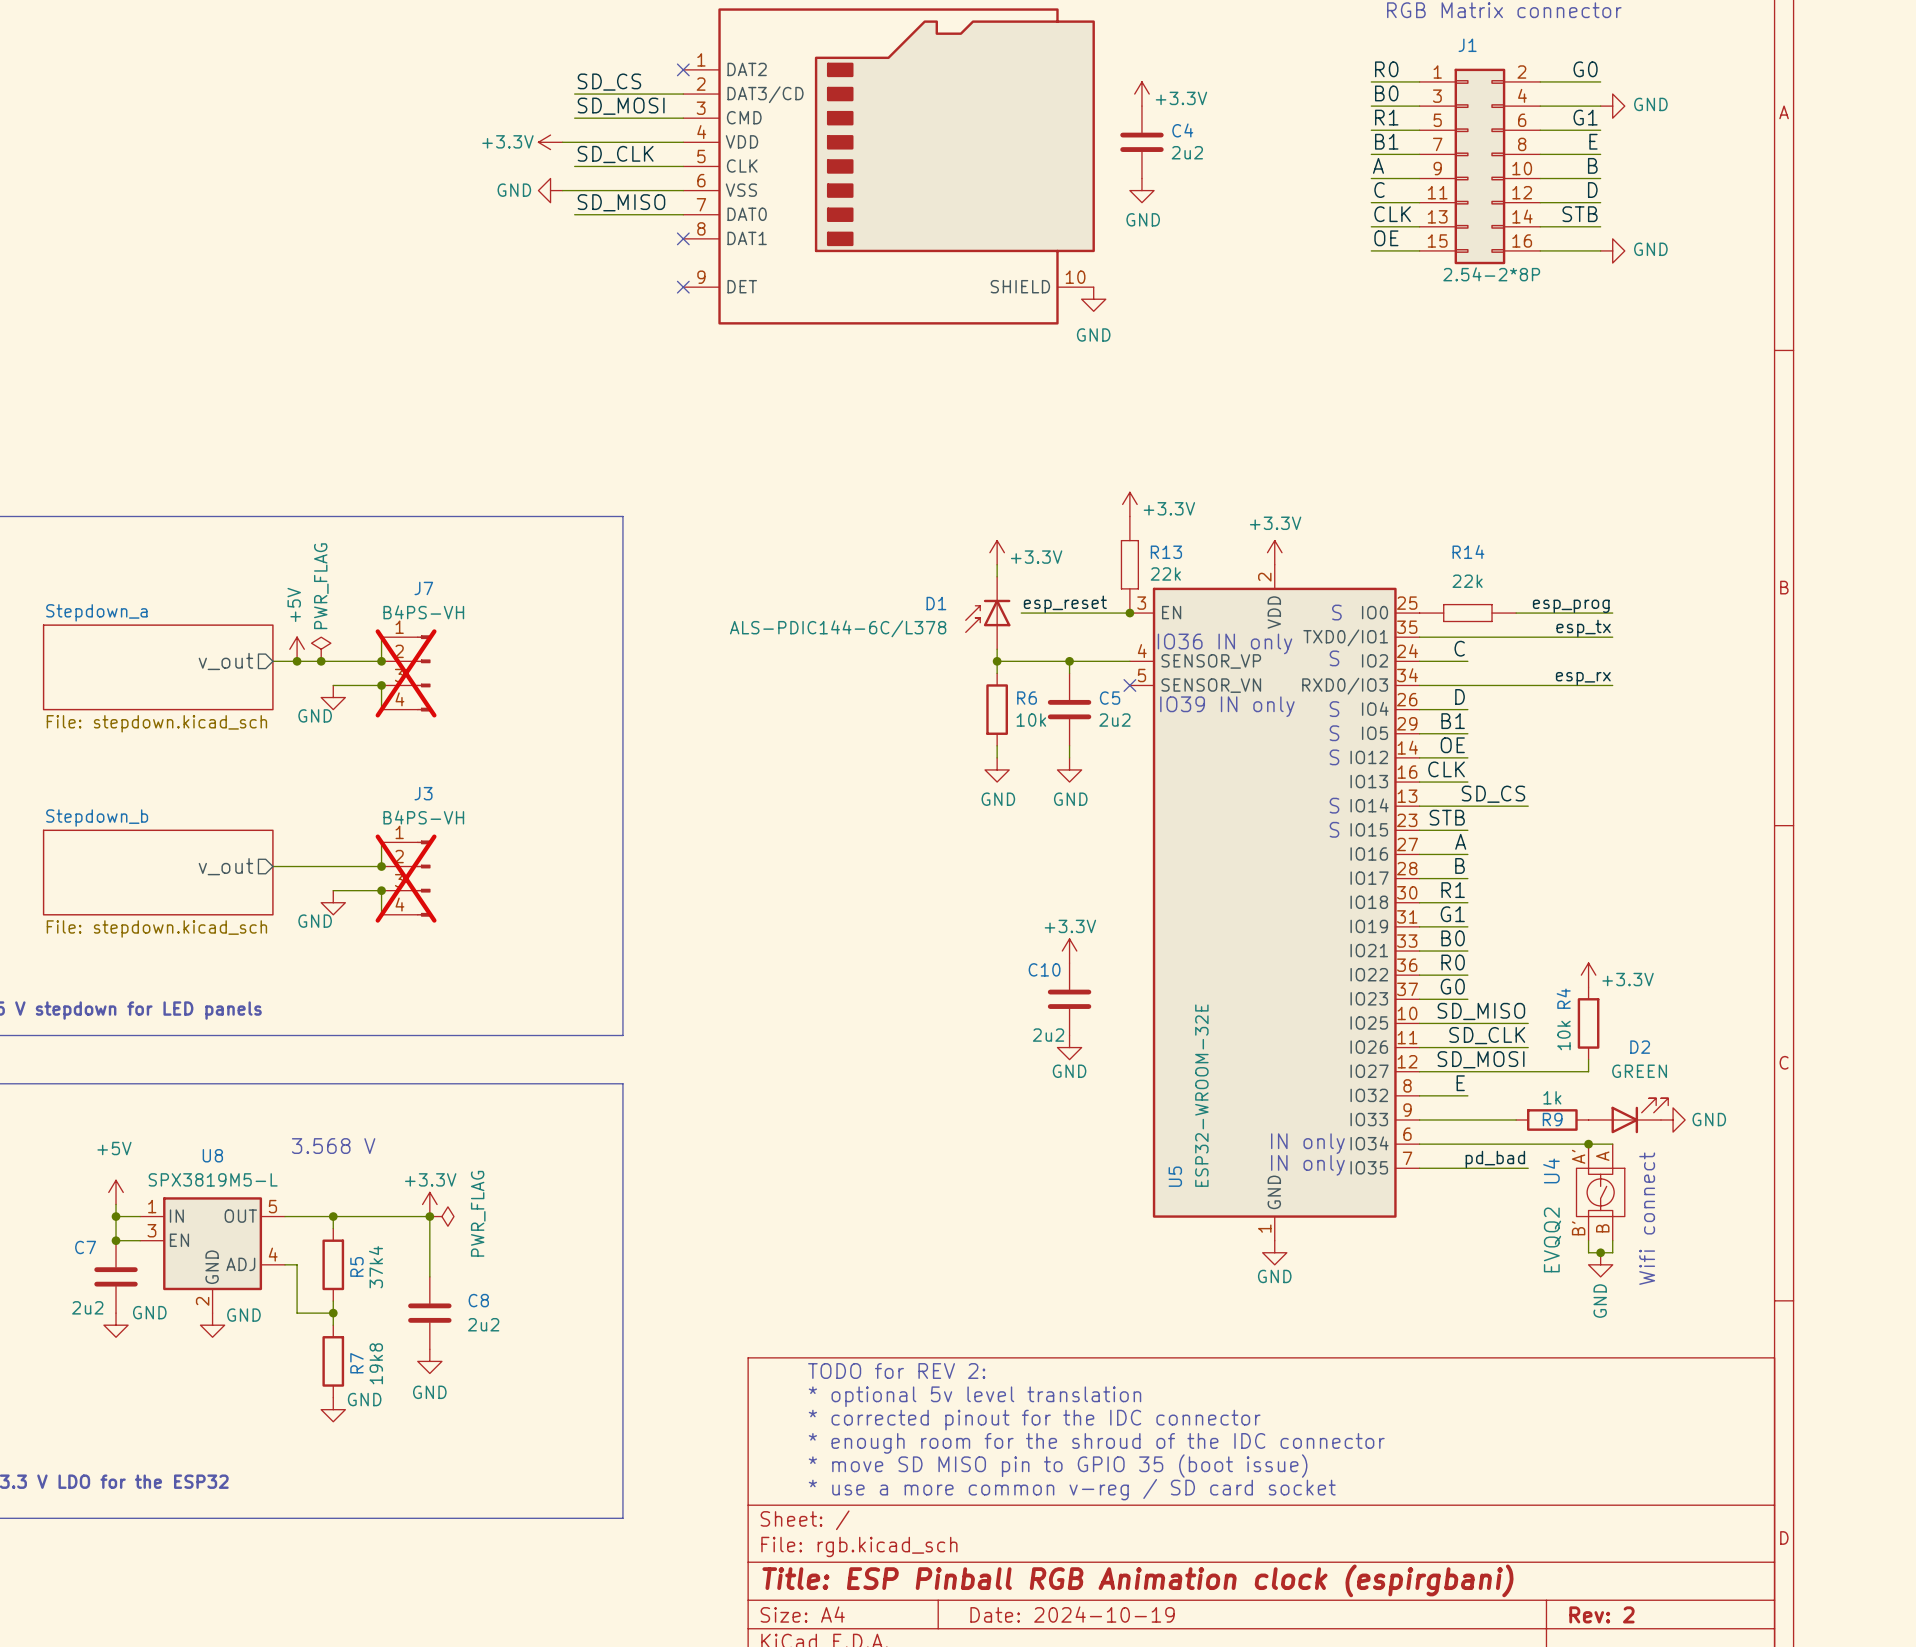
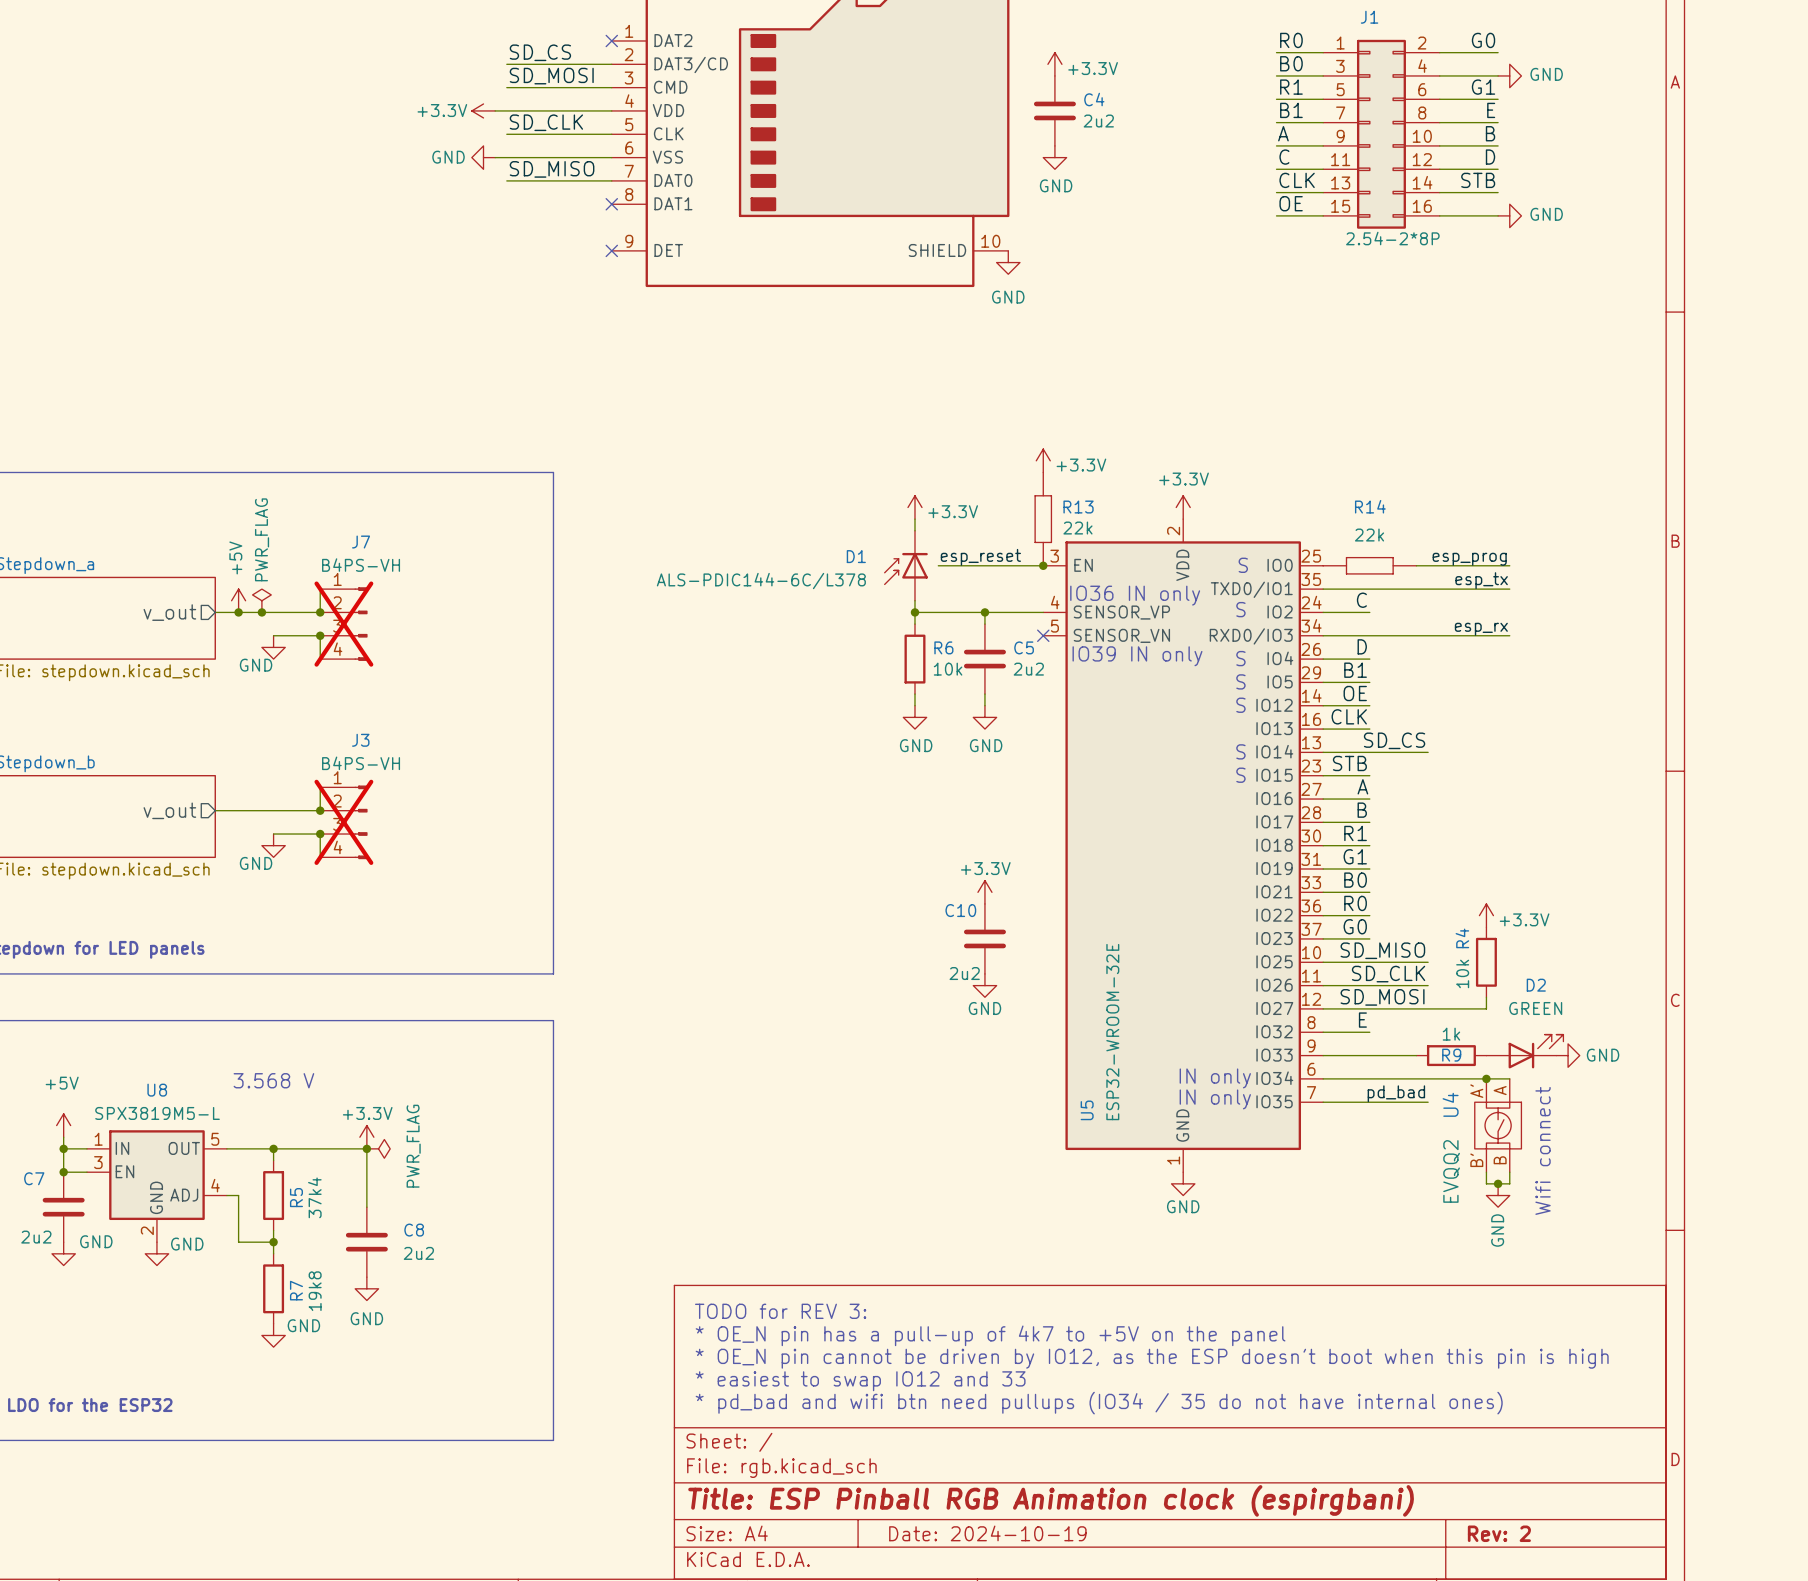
text: TODO for REV 2: (896, 1371) -> TODO for REV 3: (780, 1311)
text: * optional 5v level translation (974, 1396) -> none
text: none -> * OE_N pin has a pull-up of 4k7 to +5V on the panel (990, 1335)
text: * corrected pinout for the IDC connector (1034, 1420) -> none
text: none -> * OE_N pin cannot be driven by IO12, as the ESP doesn't boot when this pin is high (1152, 1358)
text: * enough room for the shroud of the IDC connector (1096, 1443) -> none
text: none -> * easiest to swap IO12 and 33 (860, 1381)
text: * move SD MISO pin to GPIO 35 (boot issue) (1058, 1466) -> none
text: none -> * pd_bad and wifi btn need pullups (IO34 / 35 do not have internal ones) (1099, 1403)
text: * use a more common v-reg / SD card socket (1072, 1489) -> none

